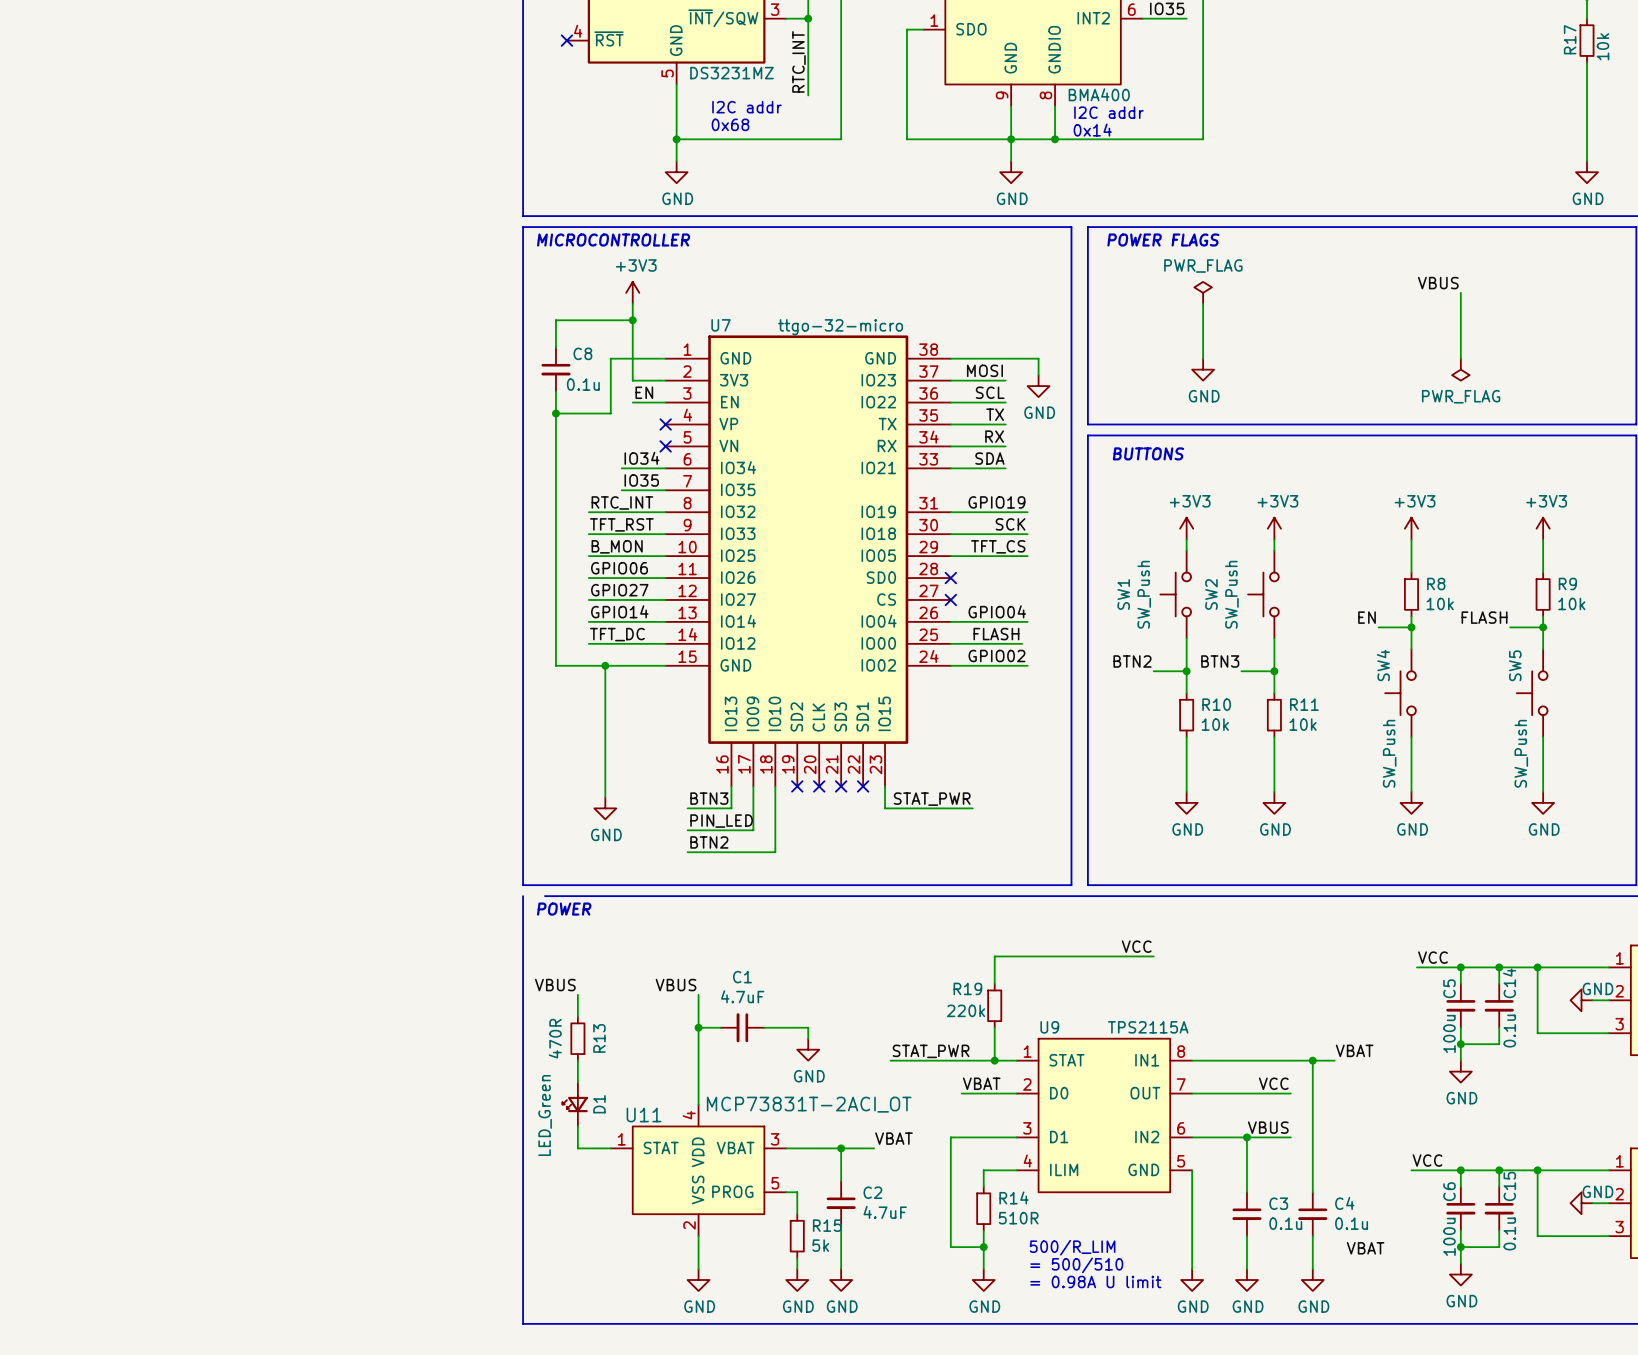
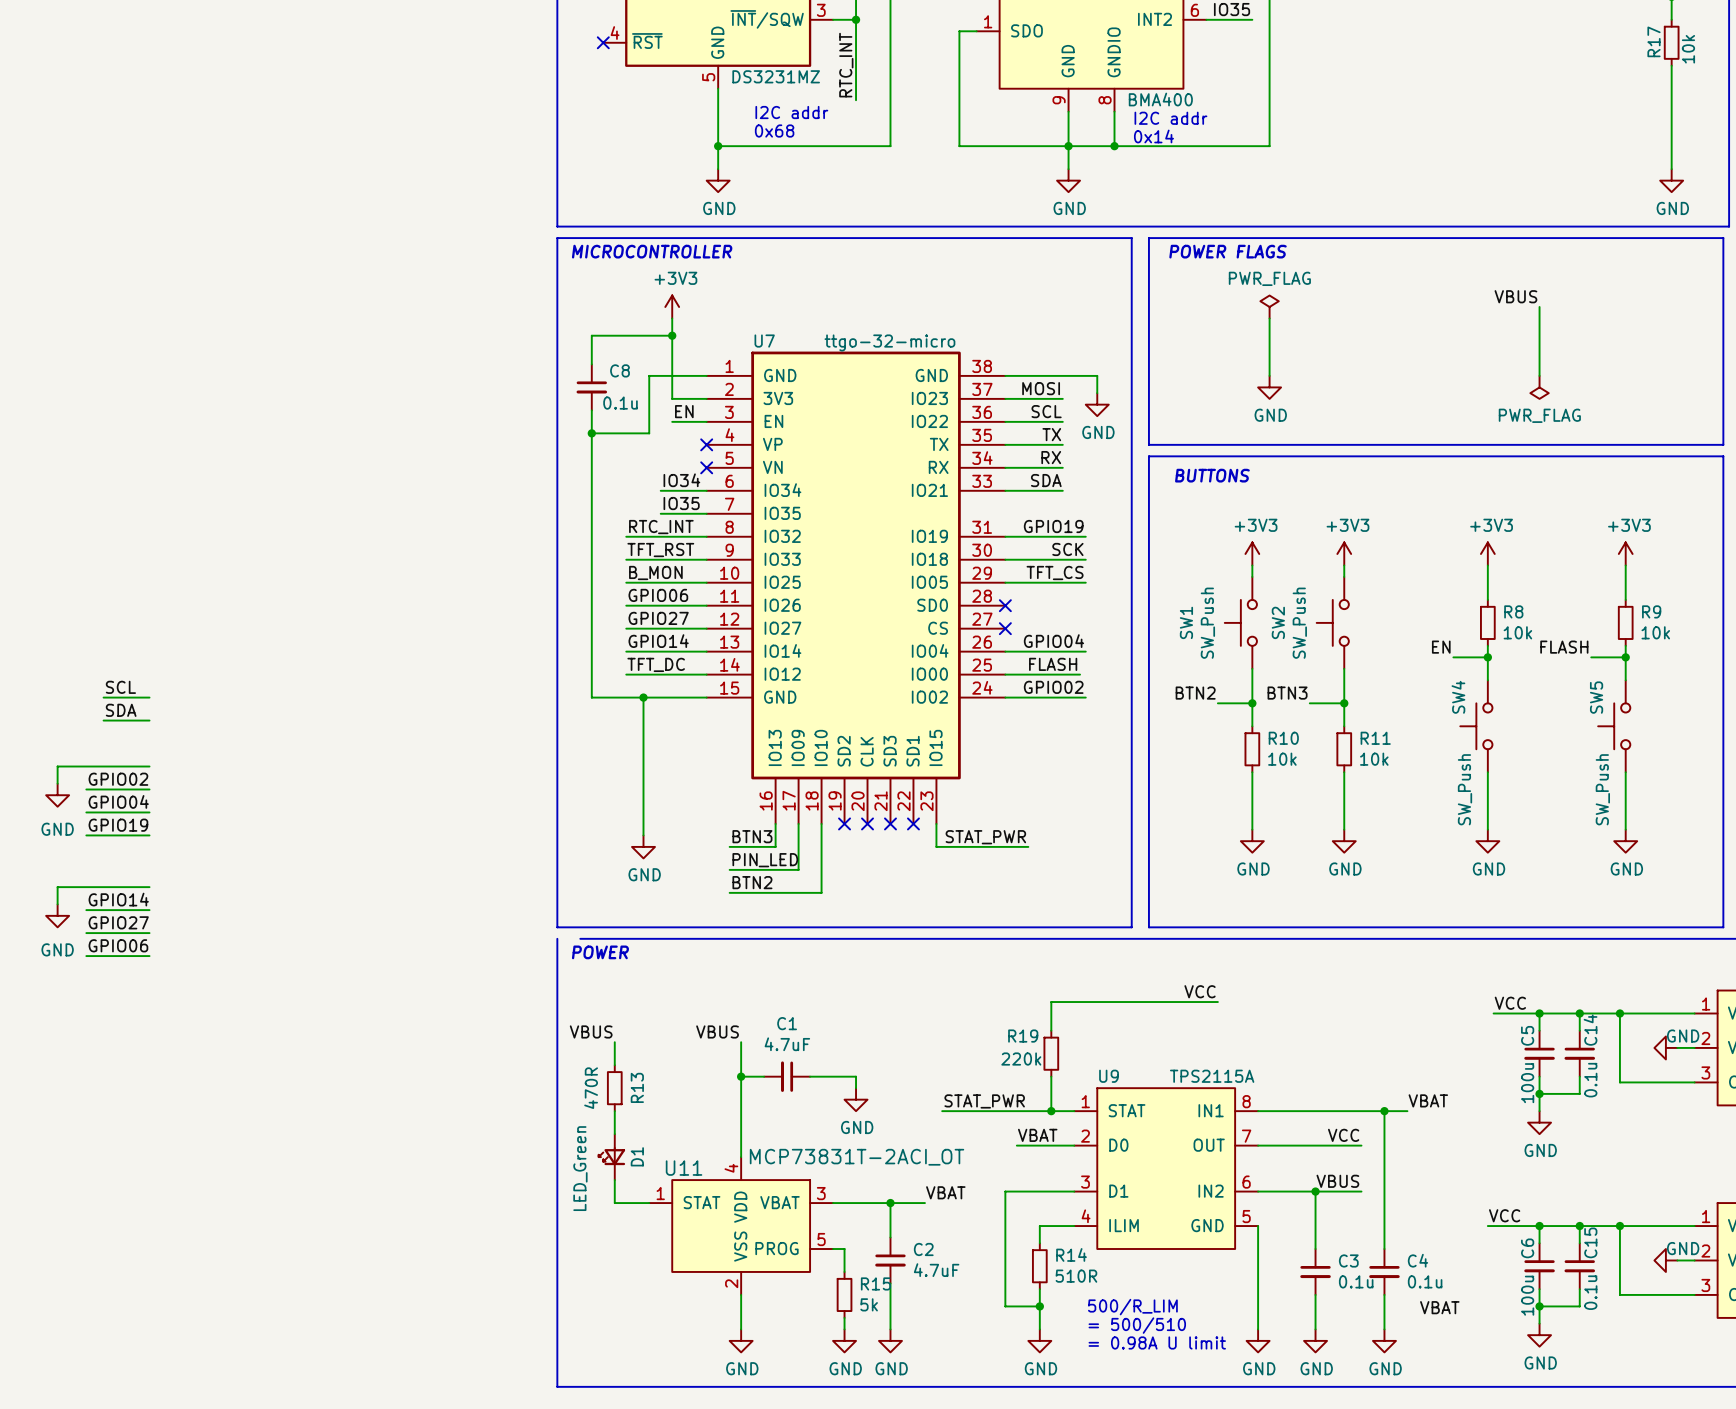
label: none -> SCL (120, 687)
wire: none -> (103, 697) (149, 697)
label: none -> SDA (121, 710)
wire: none -> (103, 720) (149, 720)
wire: none -> (149, 766) (57, 766) (57, 783)
label: none -> GPIO02 (118, 779)
wire: none -> (86, 789) (149, 789)
power symbol: none -> GND (57, 795)
label: none -> GPIO04 (118, 801)
wire: none -> (86, 812) (149, 812)
label: none -> GPIO19 (118, 825)
wire: none -> (86, 835) (149, 835)
wire: none -> (149, 887) (57, 887) (57, 904)
label: none -> GPIO14 (118, 899)
wire: none -> (86, 910) (149, 910)
power symbol: none -> GND (57, 915)
label: none -> GPIO27 (118, 922)
wire: none -> (86, 933) (149, 933)
label: none -> GPIO06 (118, 945)
wire: none -> (86, 956) (149, 956)

